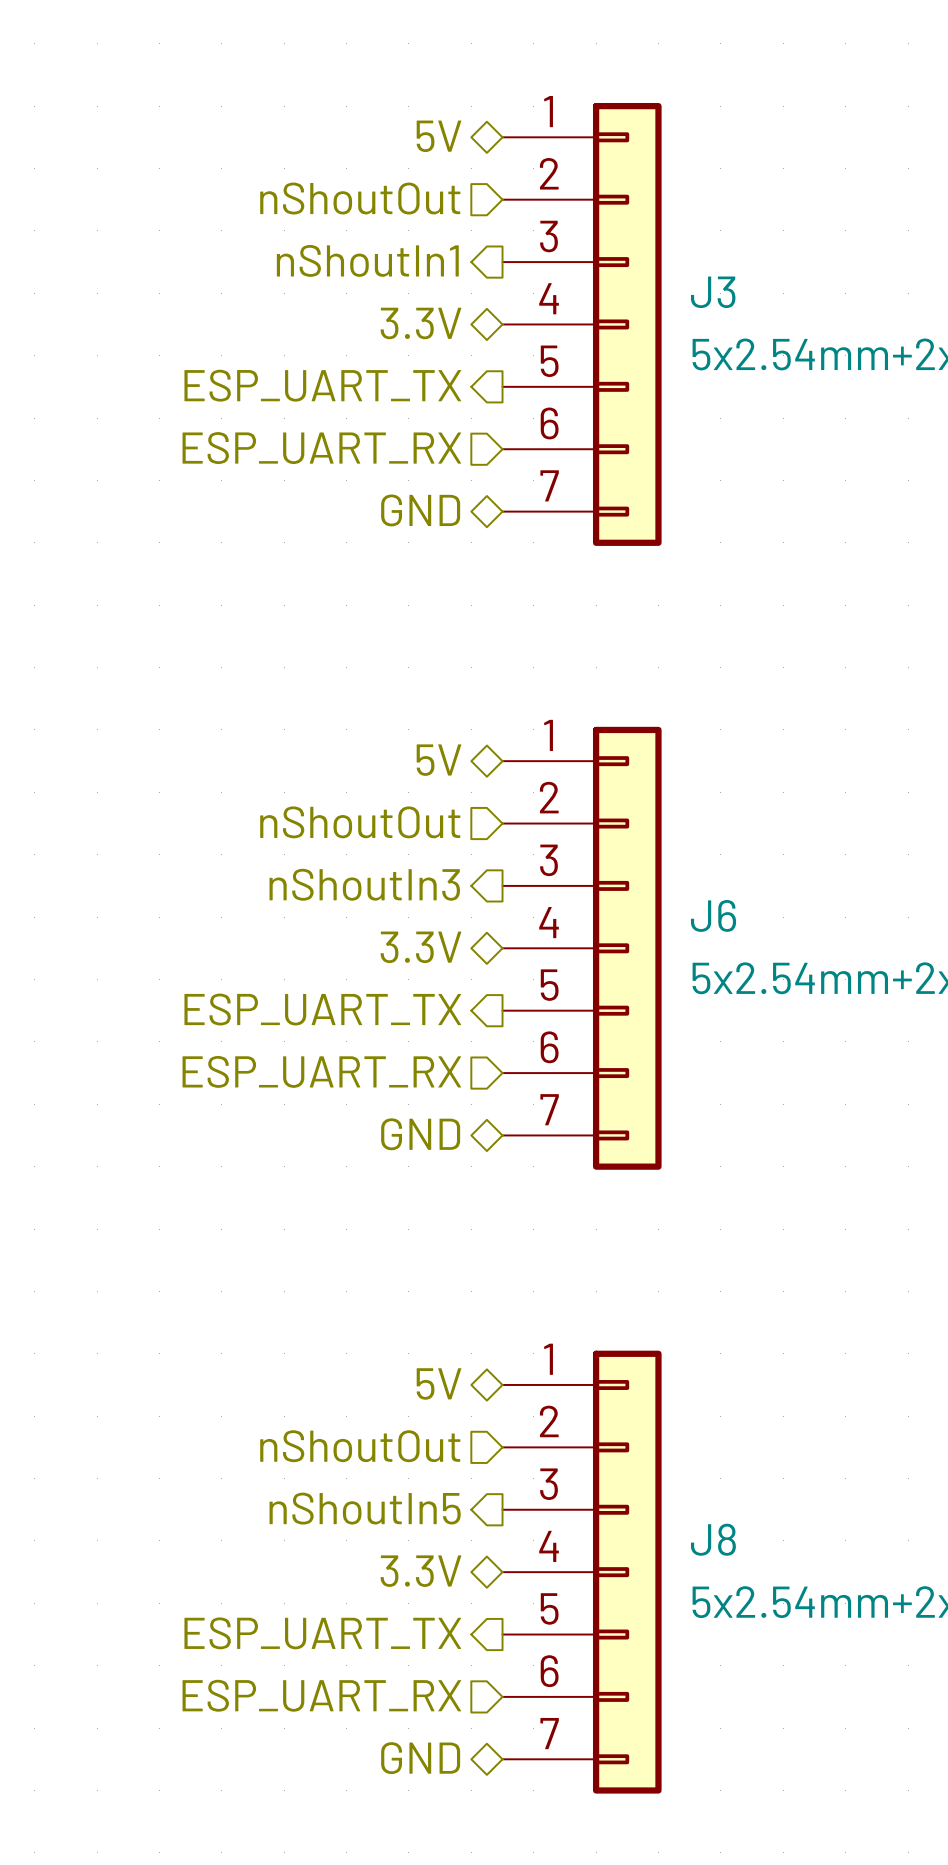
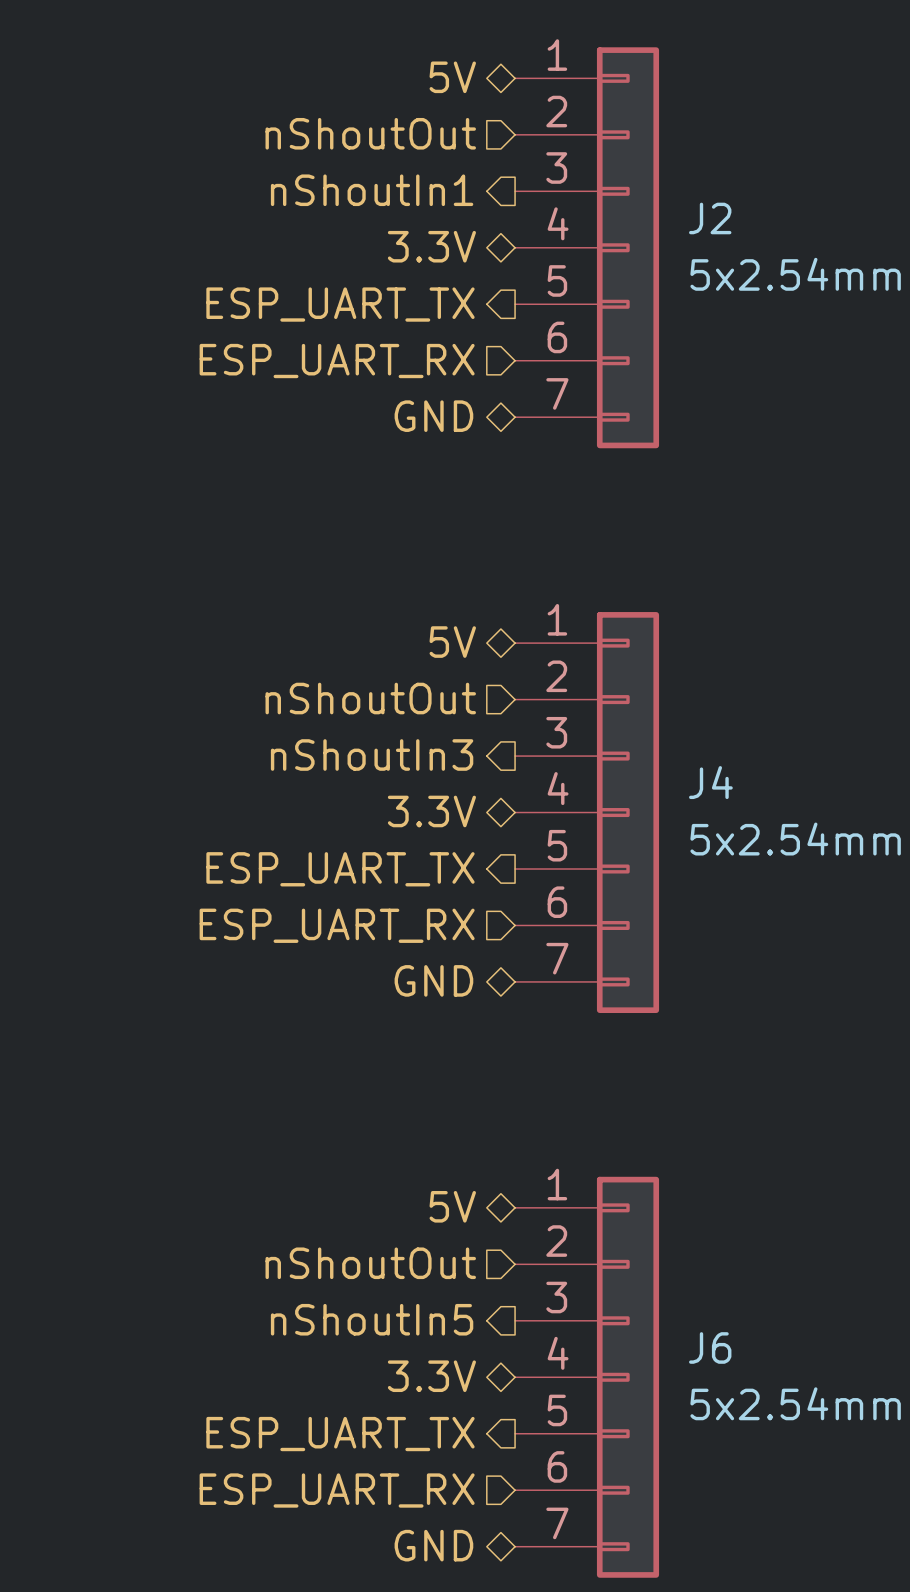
J3 name: J3 (713, 292) -> J2 (710, 218)
J6 name: J6 (713, 915) -> J4 (710, 782)
J8 name: J8 (713, 1539) -> J6 (710, 1347)

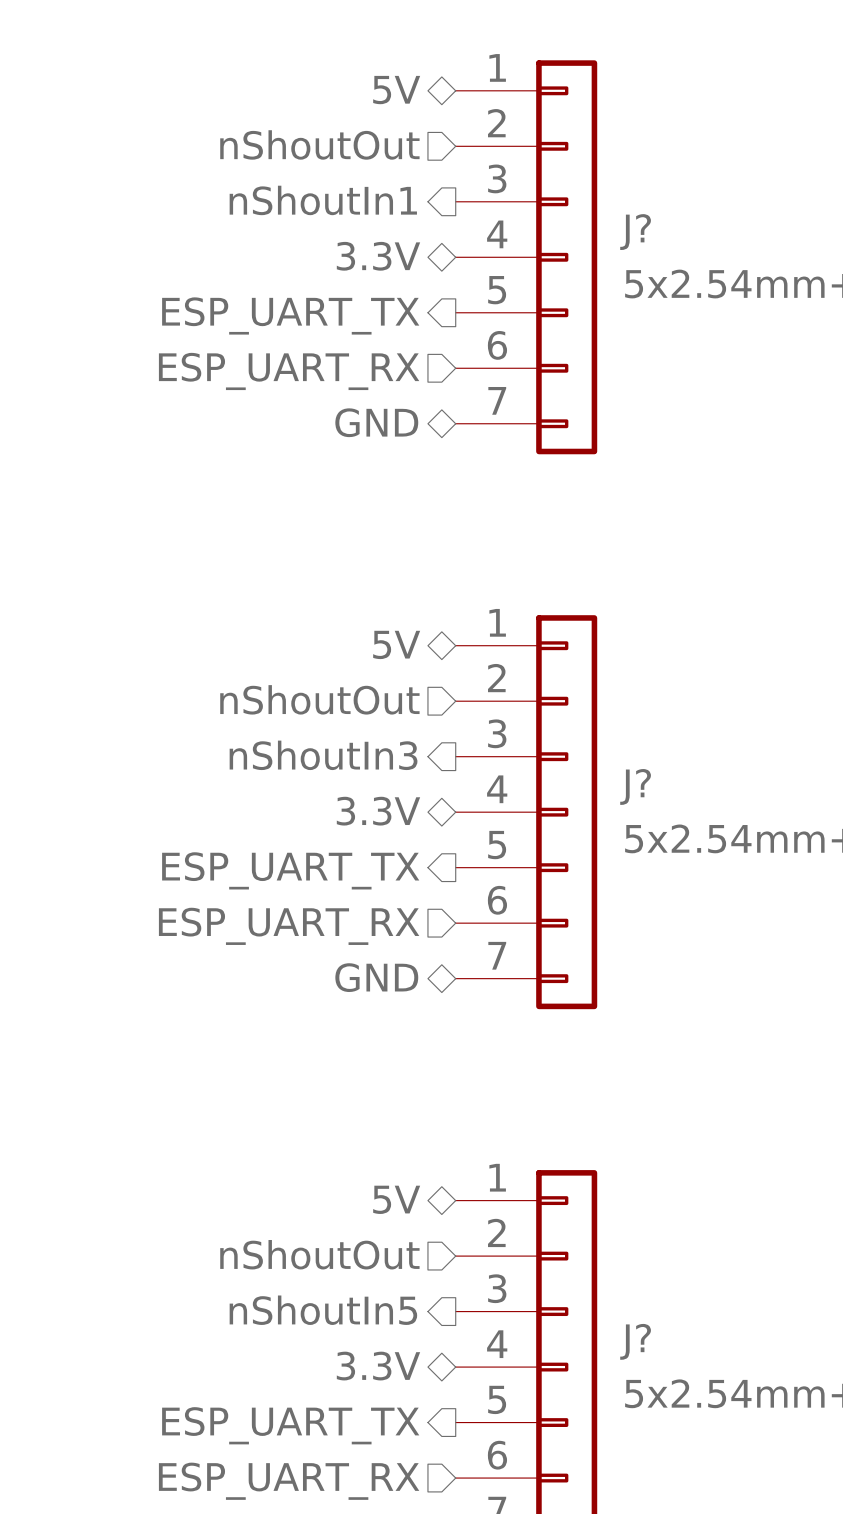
J2 name: J2 (710, 218) -> J? (635, 232)
J4 name: J4 (710, 782) -> J? (635, 786)
J6 name: J6 (710, 1347) -> J? (635, 1341)

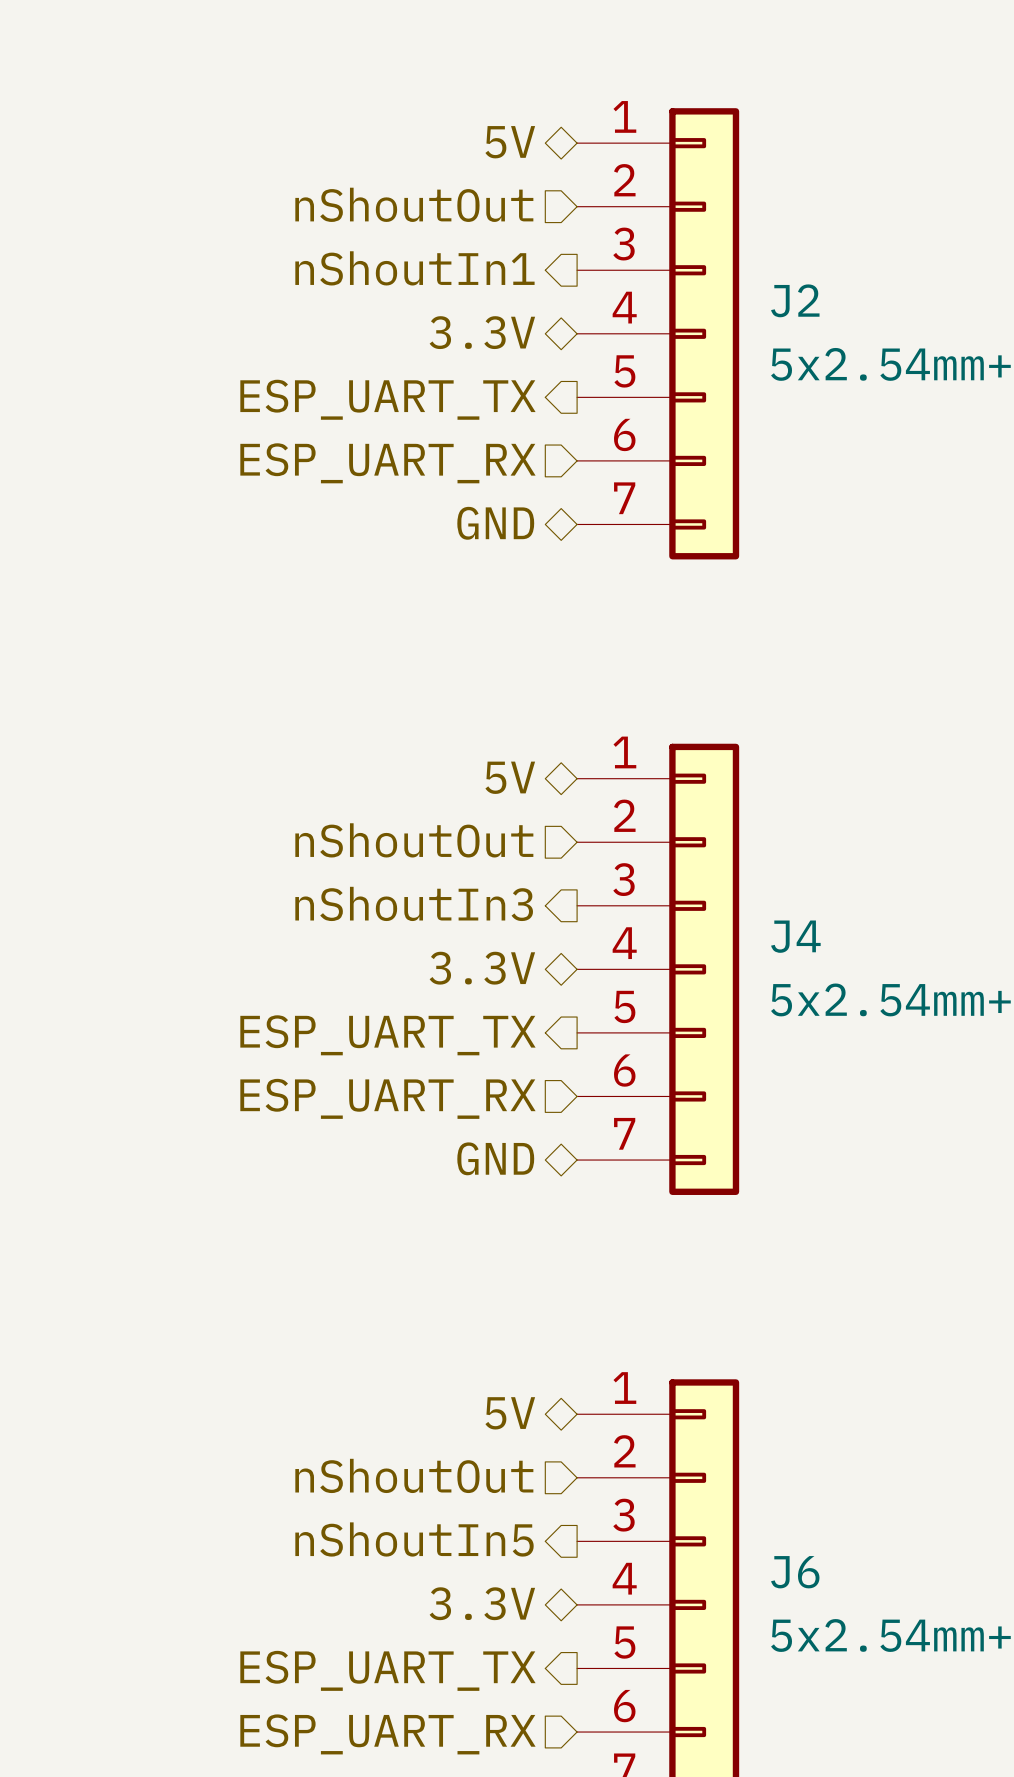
J? name: J? (635, 232) -> J2 (795, 300)
J? name: J? (635, 786) -> J4 (795, 936)
J? name: J? (635, 1341) -> J6 (795, 1572)

